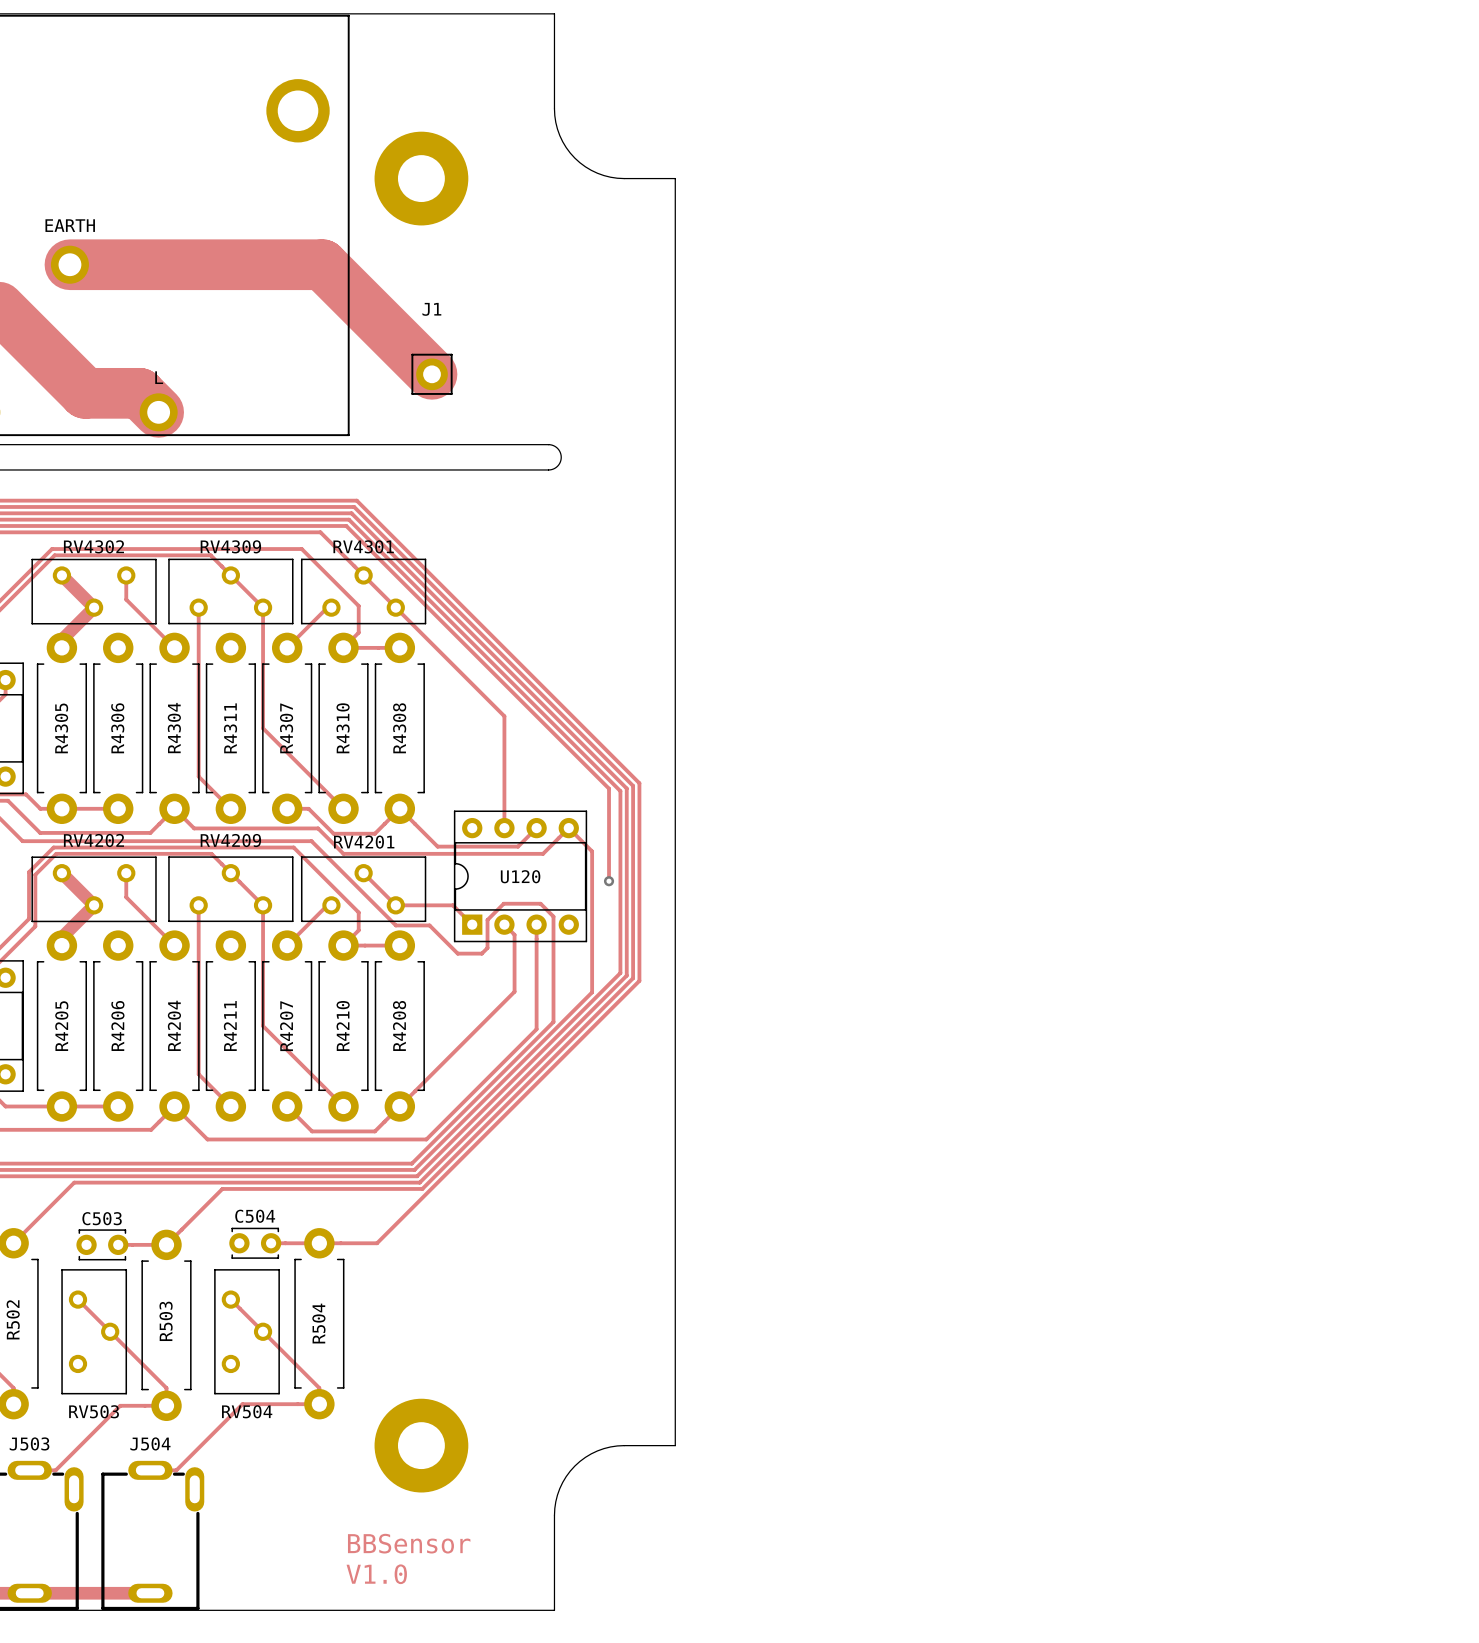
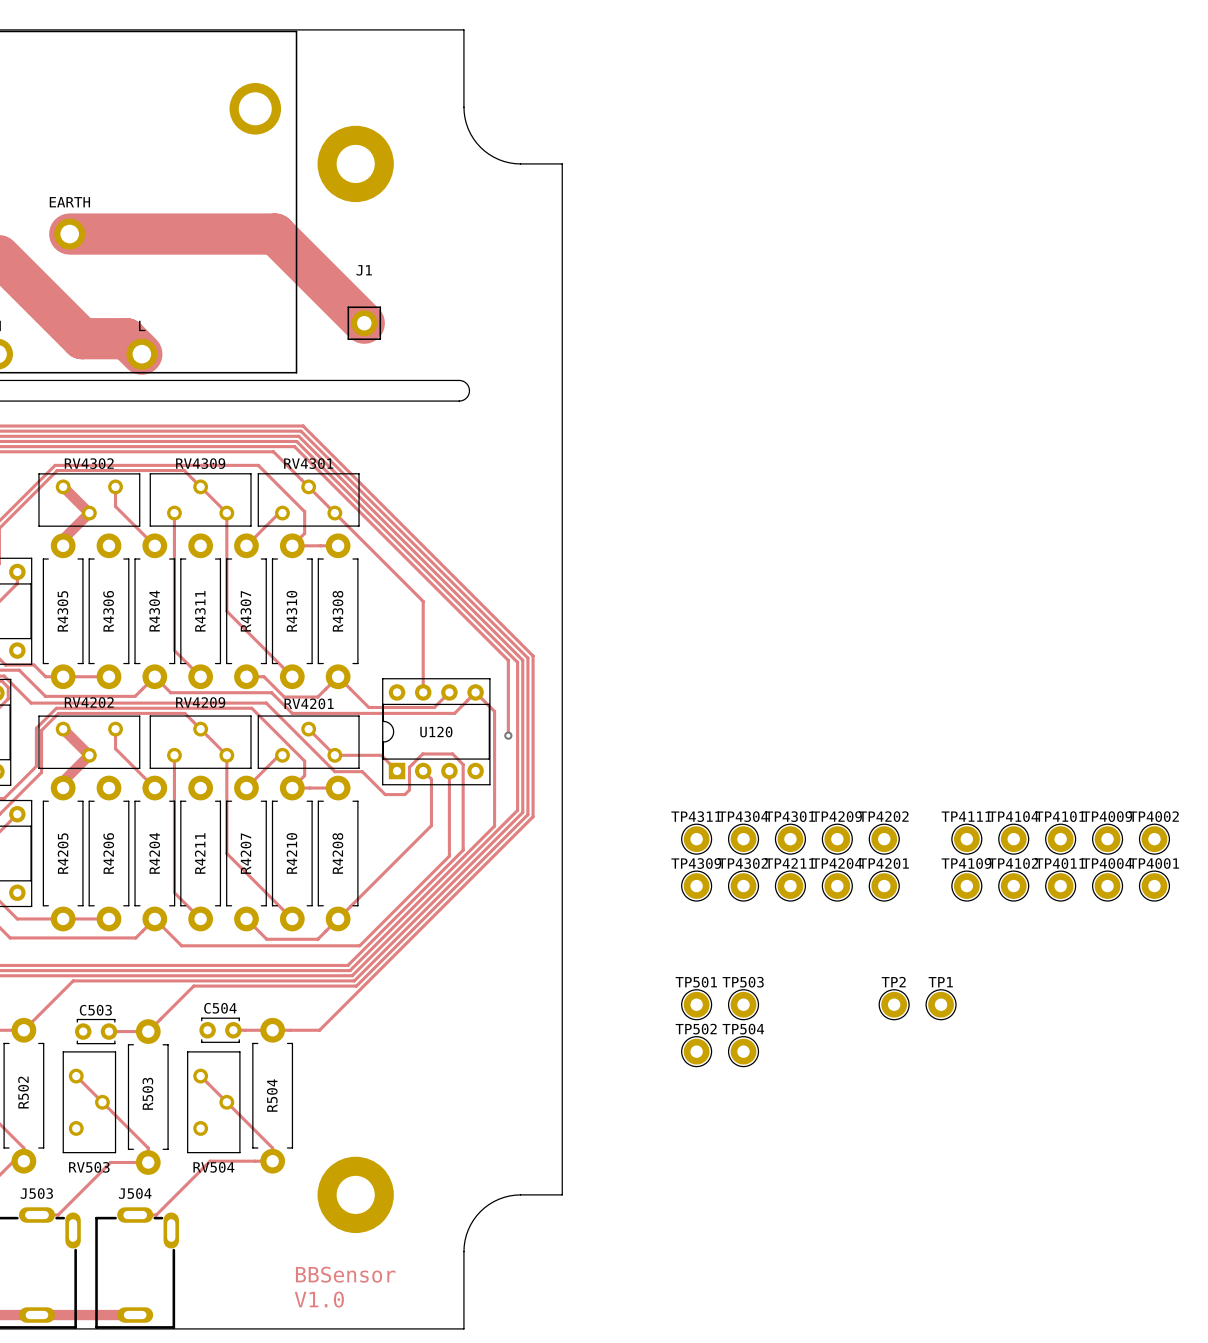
TP4311: none -> (696, 839)
TP4304: none -> (743, 839)
TP4301: none -> (790, 839)
TP4209: none -> (837, 839)
TP4202: none -> (884, 839)
TP4111: none -> (966, 839)
TP4104: none -> (1013, 839)
TP4101: none -> (1060, 839)
TP4009: none -> (1107, 839)
TP4002: none -> (1154, 839)
TP4309: none -> (696, 886)
TP4302: none -> (743, 886)
TP4211: none -> (790, 886)
TP4204: none -> (837, 886)
TP4201: none -> (884, 886)
TP4109: none -> (966, 886)
TP4102: none -> (1013, 886)
TP4011: none -> (1060, 886)
TP4004: none -> (1107, 886)
TP4001: none -> (1154, 886)
TP501: none -> (696, 1004)
TP503: none -> (743, 1004)
TP2: none -> (894, 1004)
TP1: none -> (941, 1004)
TP502: none -> (696, 1051)
TP504: none -> (743, 1051)

